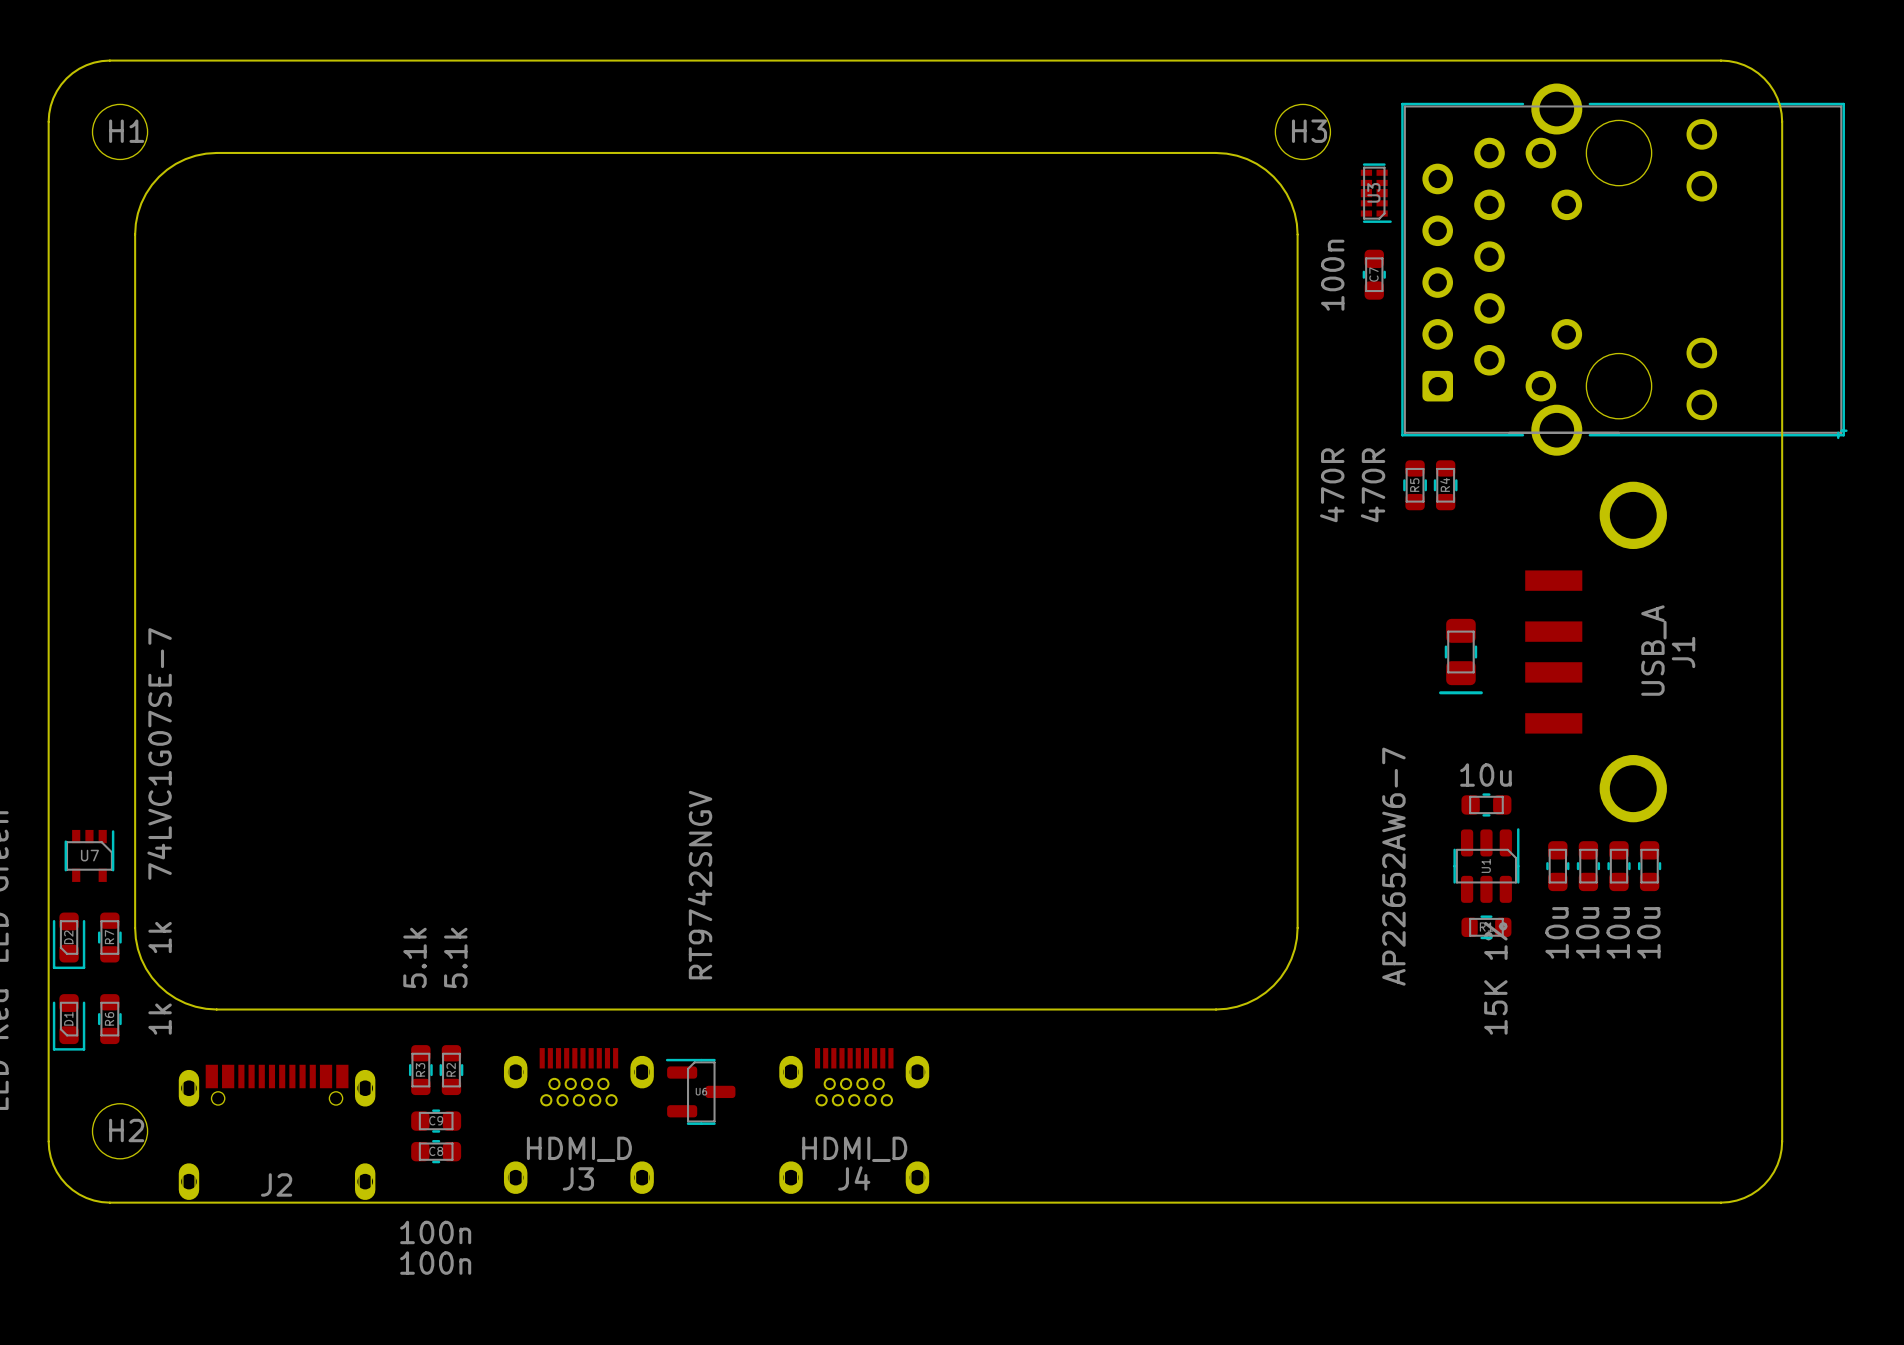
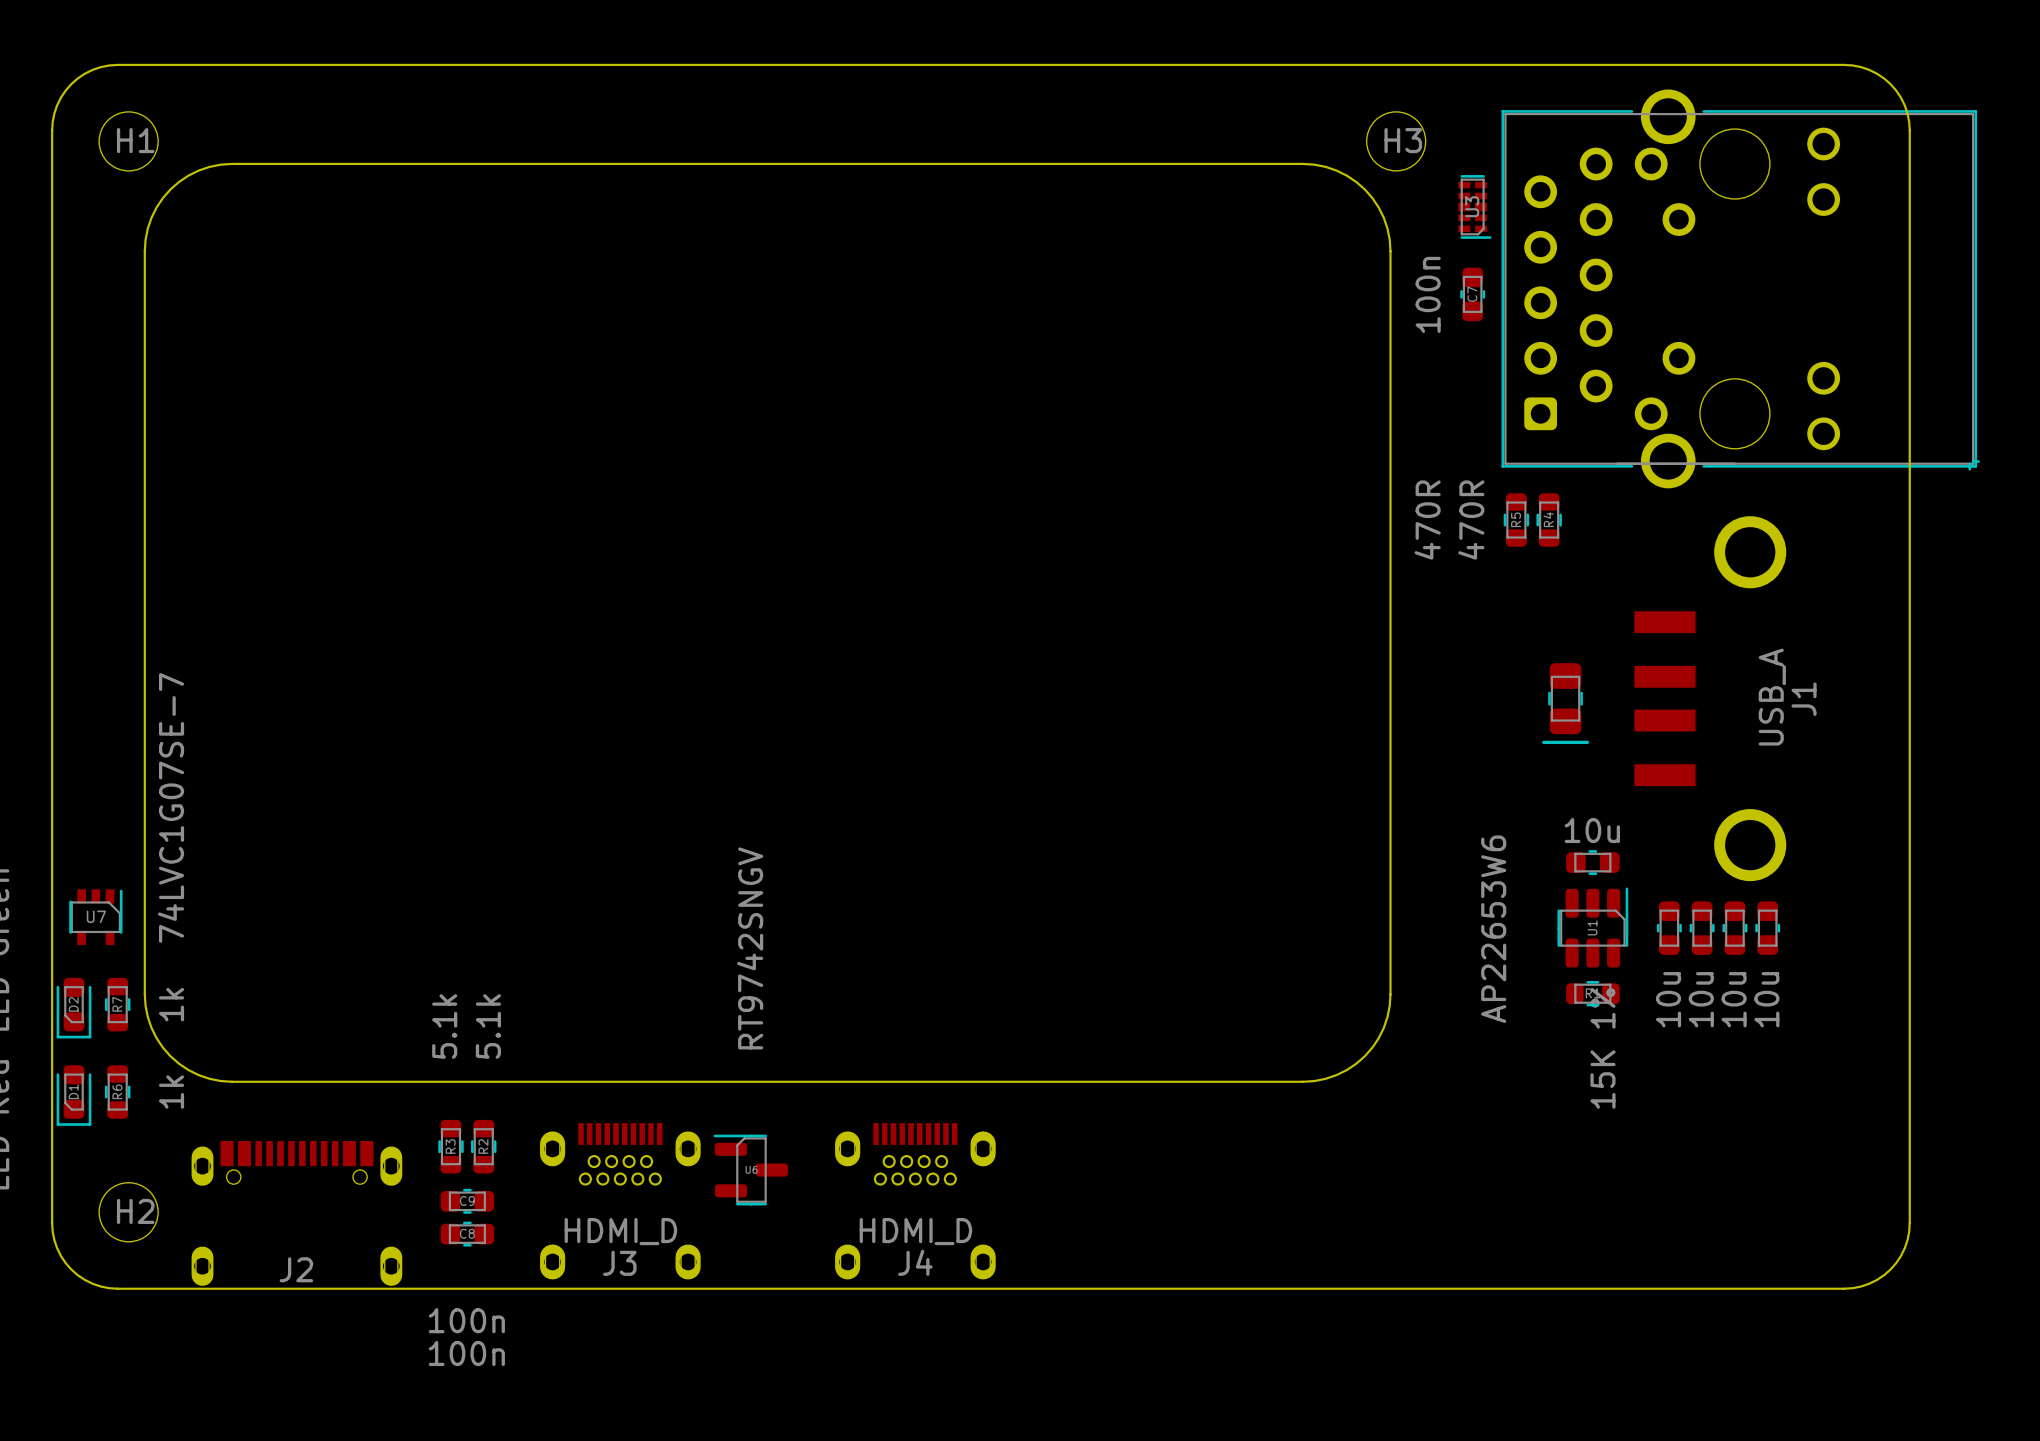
U1 value: AP22652AW6-7 (1393, 866) -> AP22653W6 (1493, 929)

